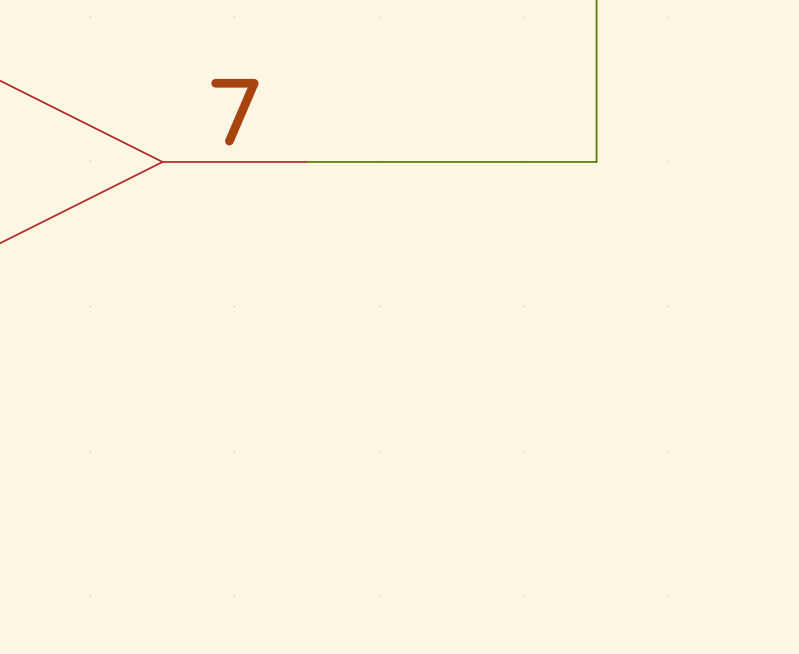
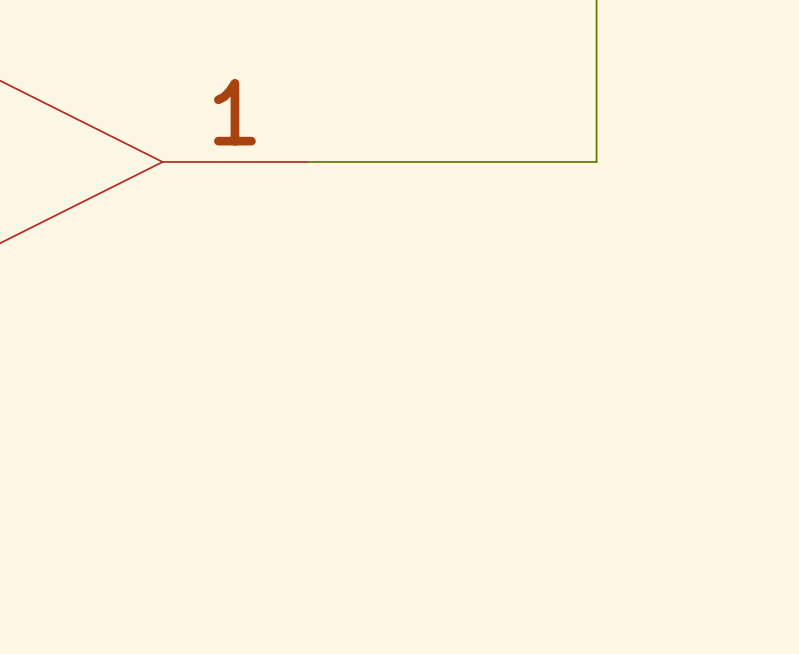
part pin number: 7 (234, 112) -> 1 (234, 112)

